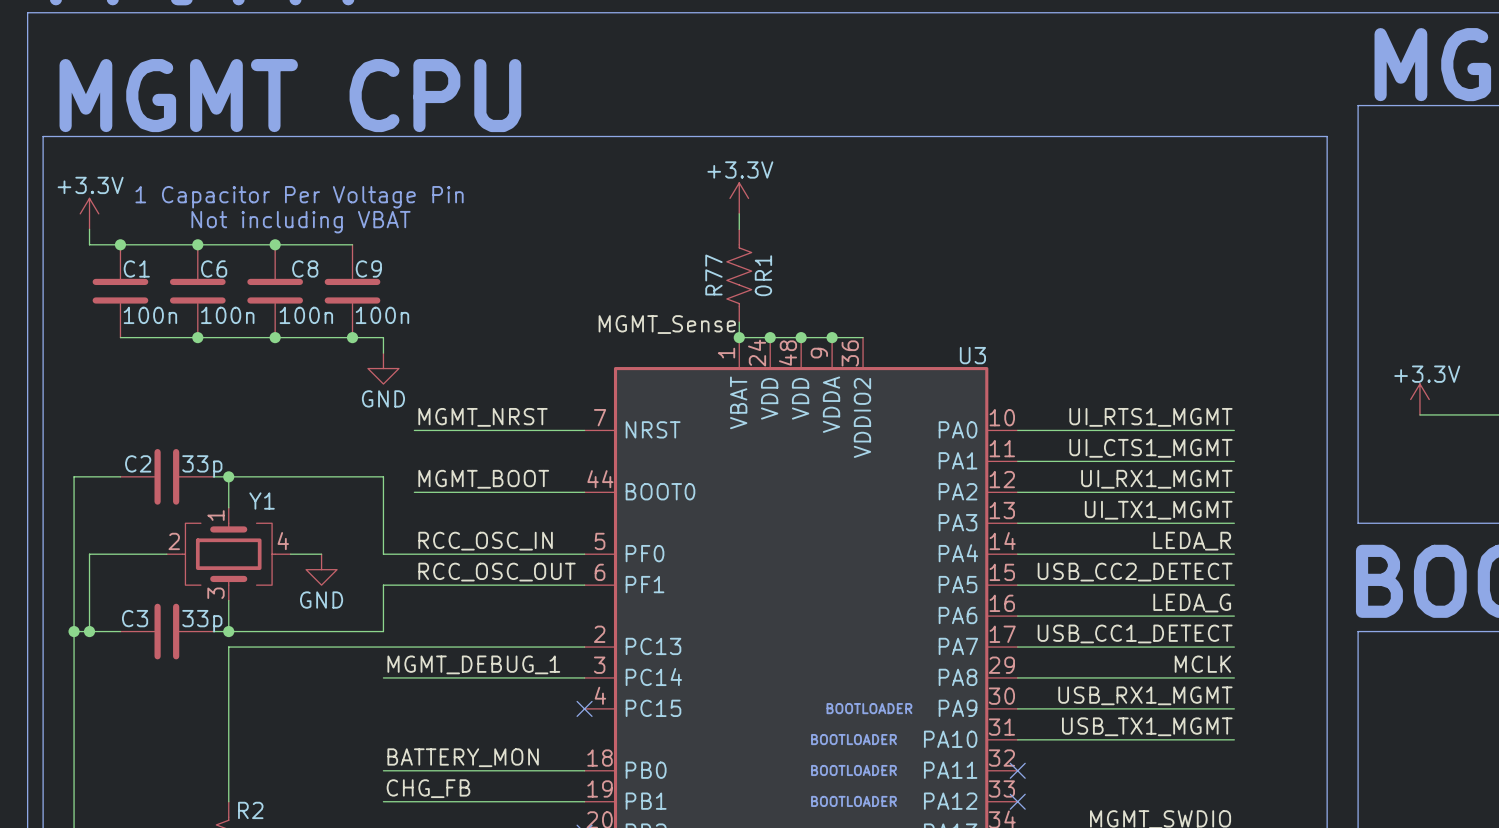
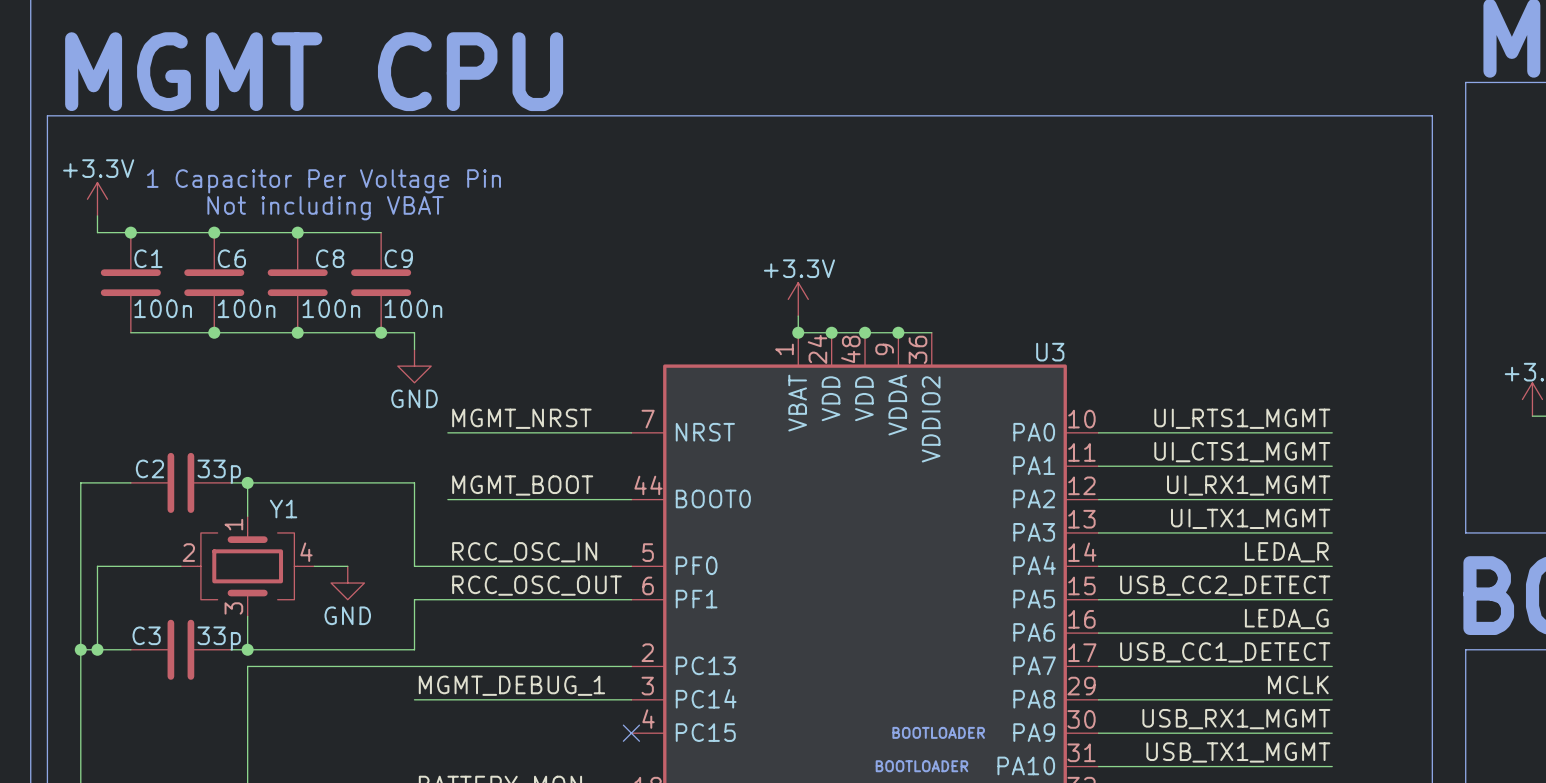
power symbol position: +3.3V (739, 198) -> +3.3V (798, 299)
wire: (739, 213) (739, 229) -> none
R77: 0R1 (739, 275) -> none
label: MGMT_Sense (667, 324) -> none

